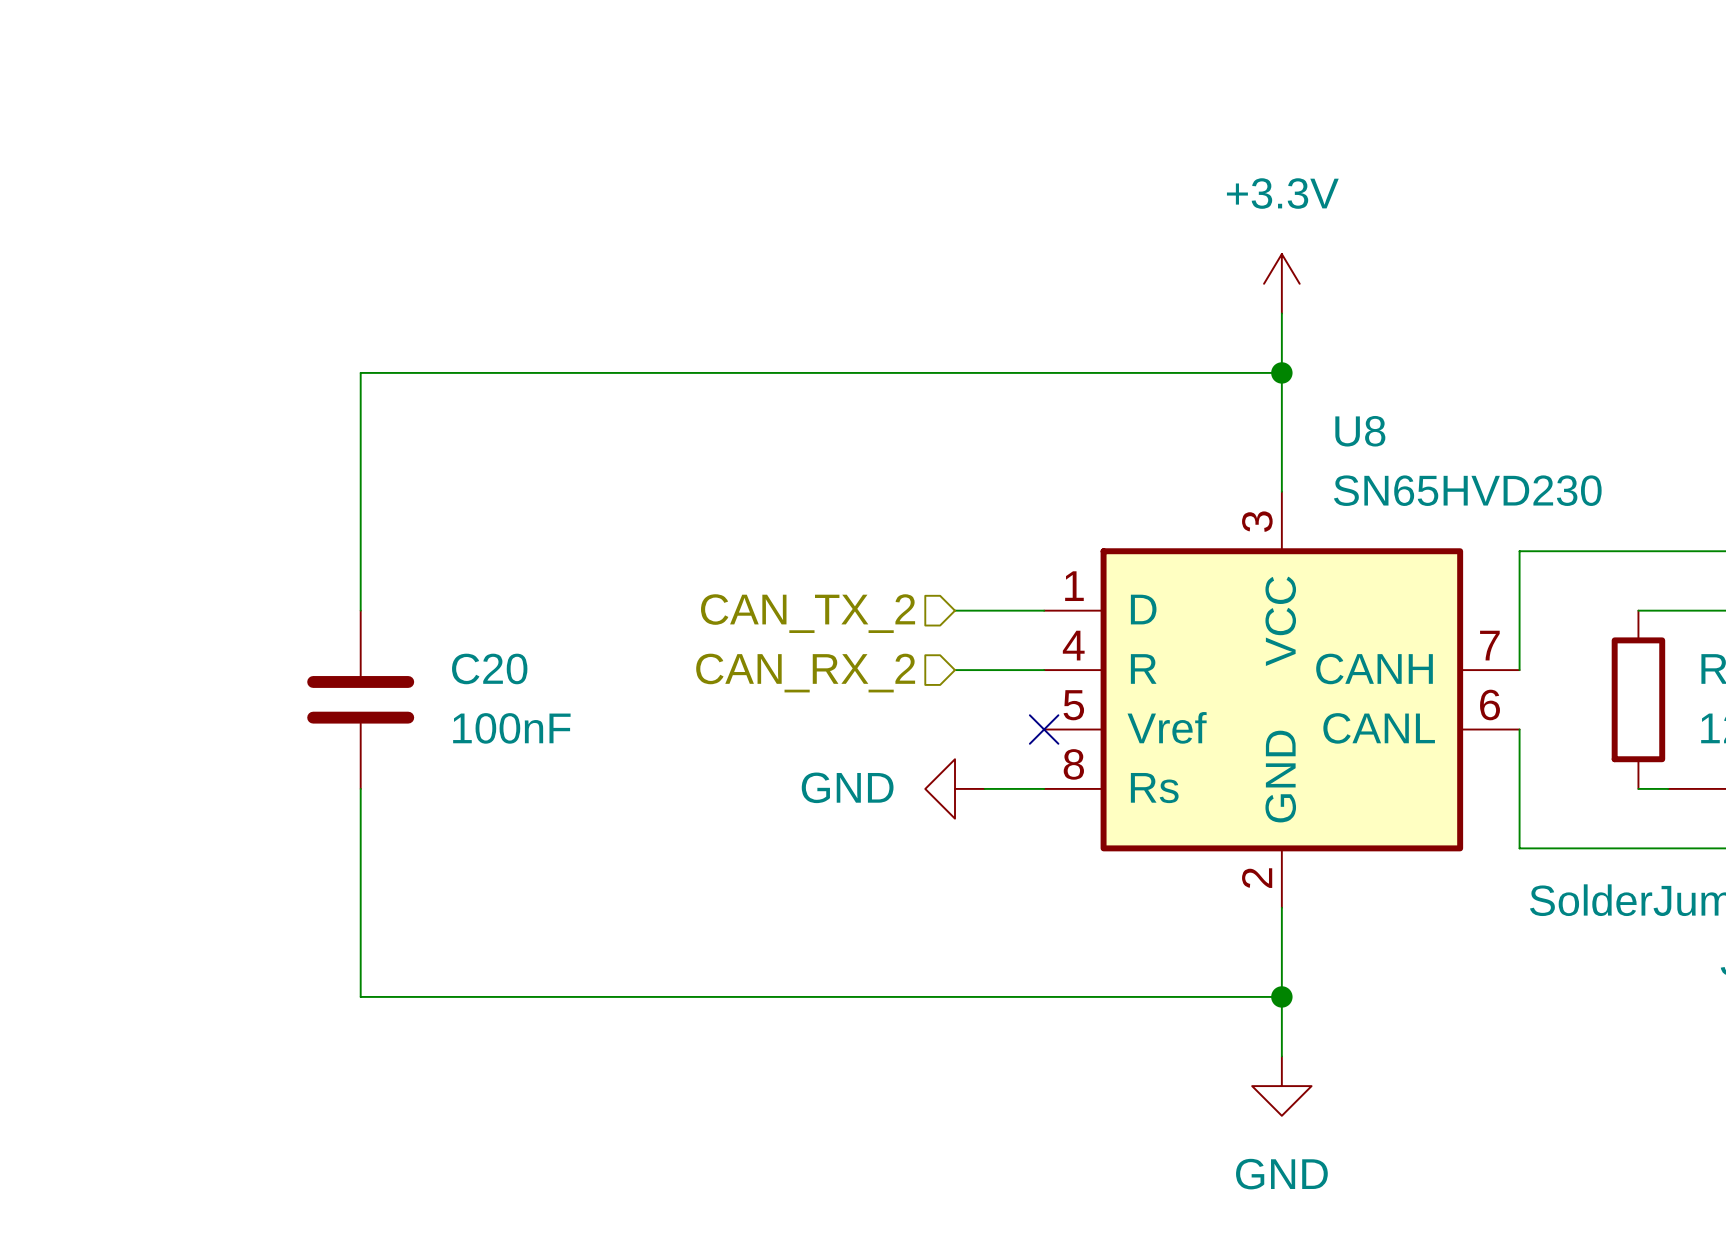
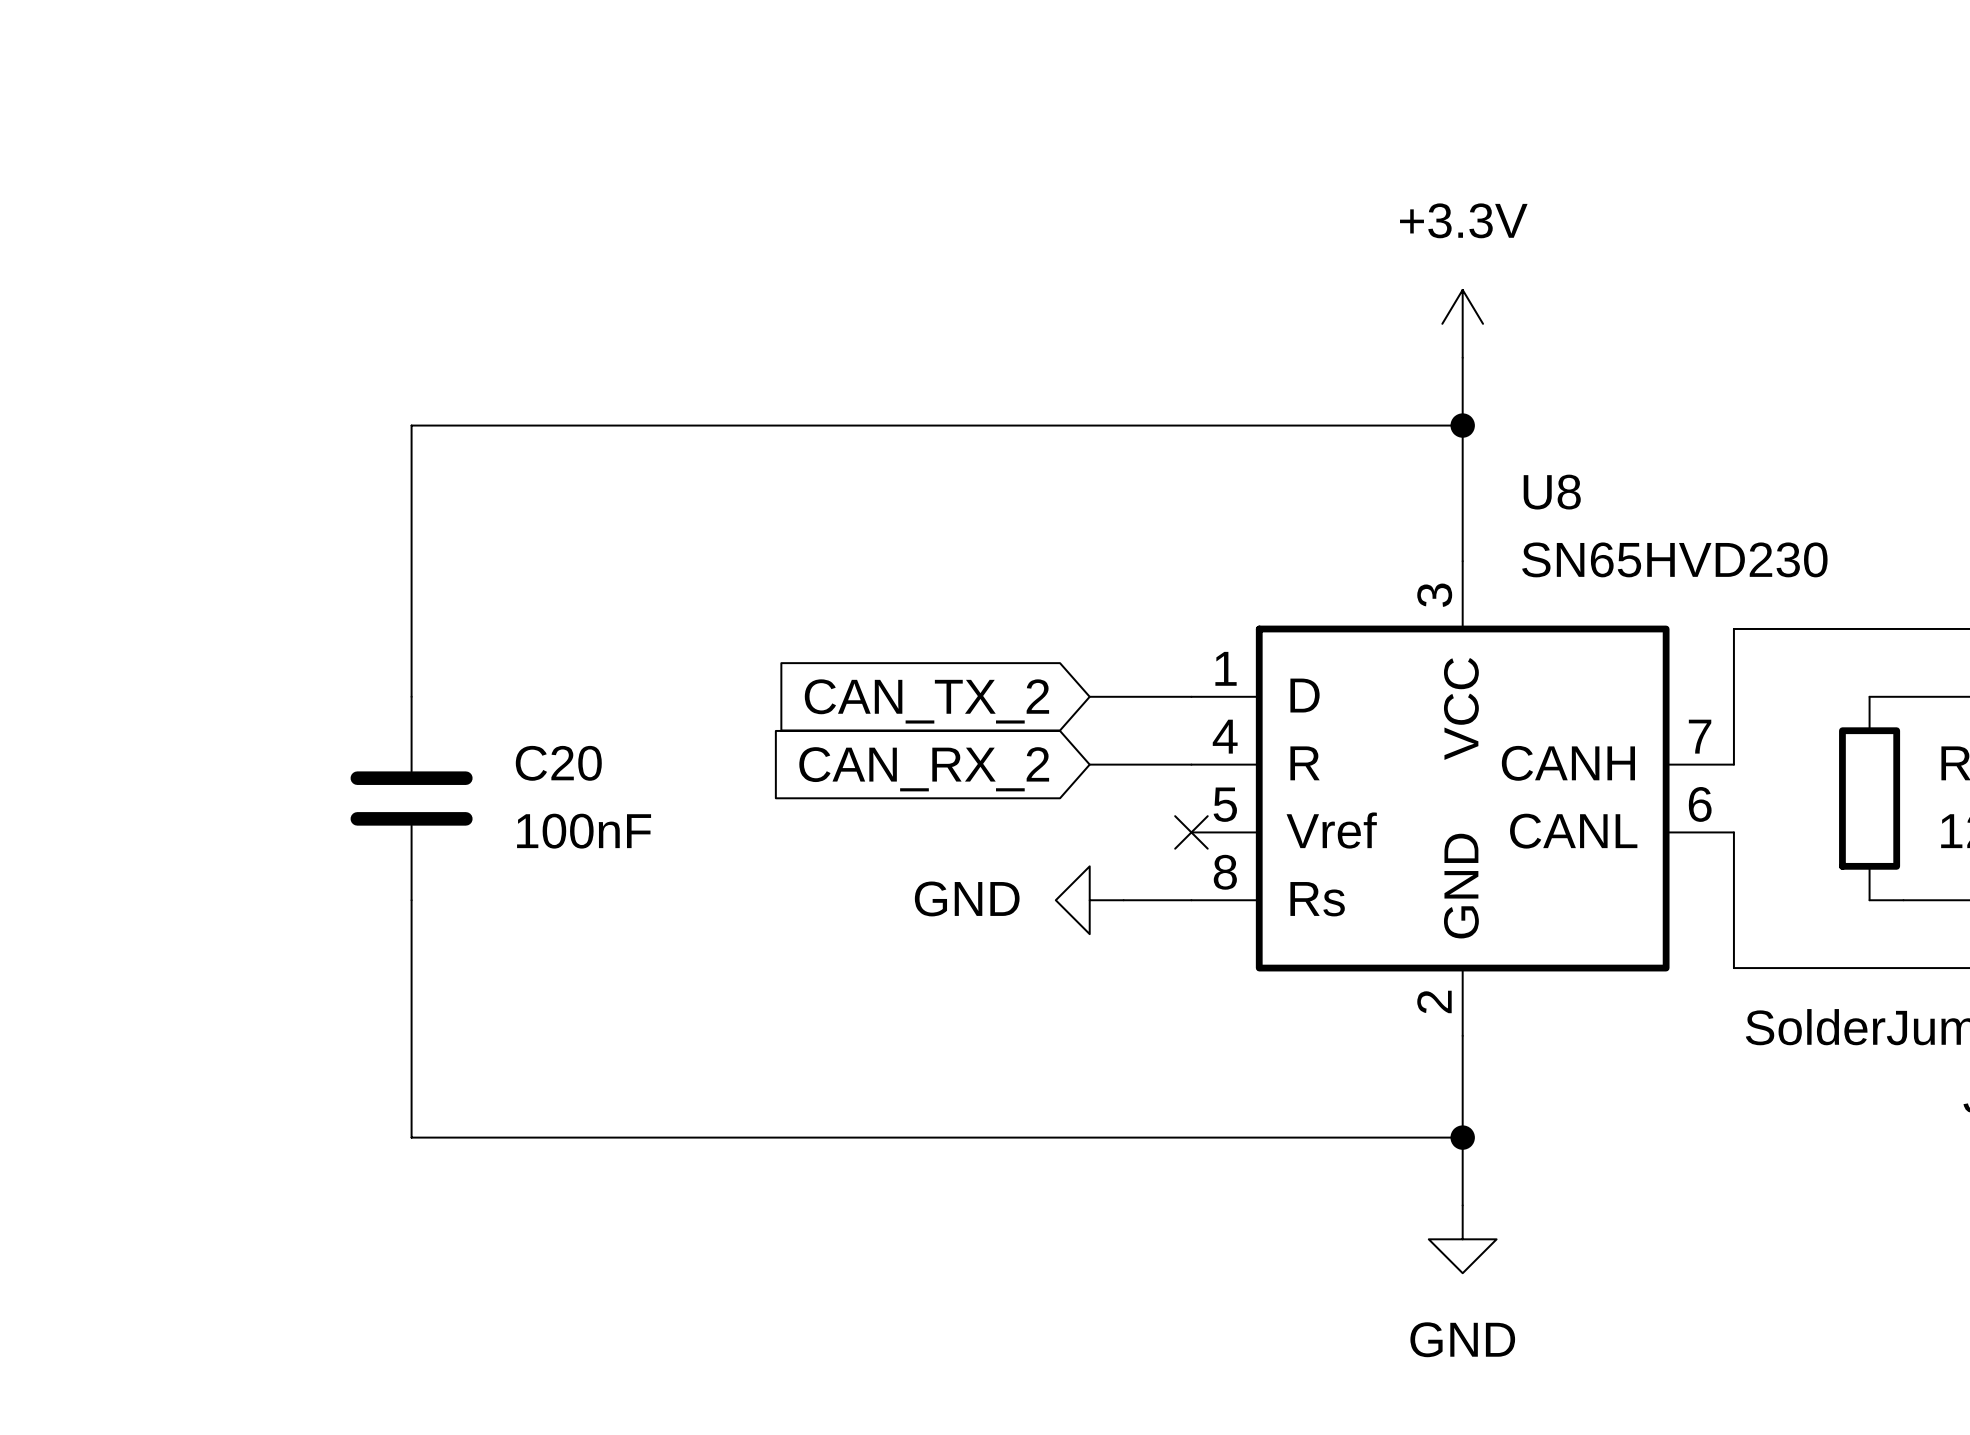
hierarchical label: CAN_TX_2 (808, 613) -> none
global label: none -> CAN_TX_2 (926, 701)
hierarchical label: CAN_RX_2 (805, 673) -> none
global label: none -> CAN_RX_2 (924, 769)

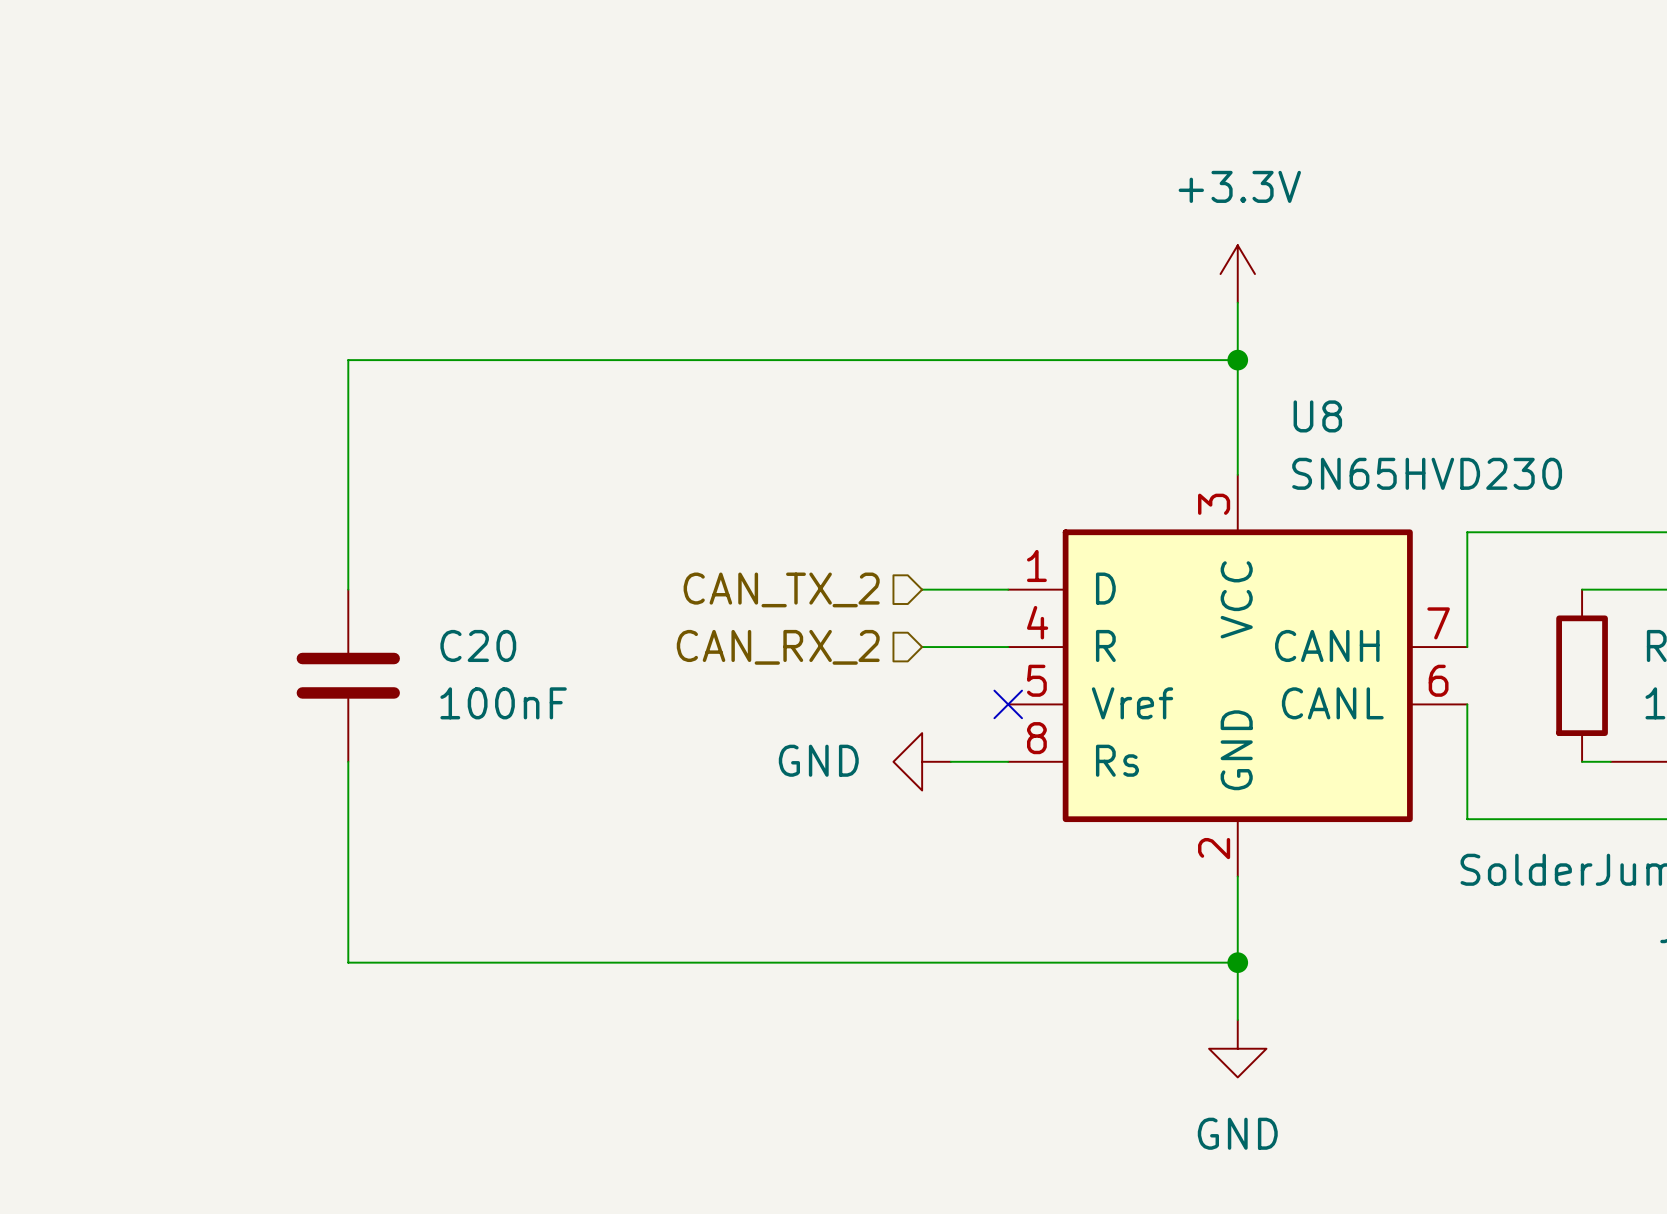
hierarchical label: none -> CAN_TX_2 (781, 589)
global label: CAN_TX_2 (926, 701) -> none
hierarchical label: none -> CAN_RX_2 (778, 647)
global label: CAN_RX_2 (924, 769) -> none

